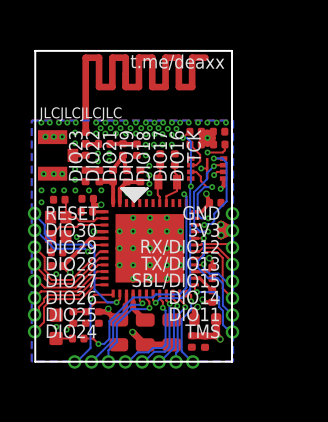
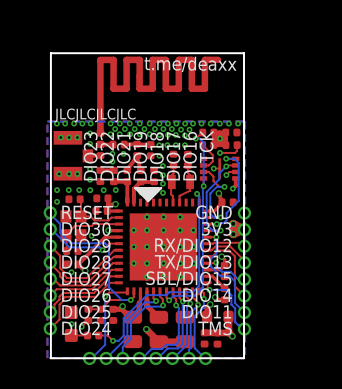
via: (109, 160) -> none

